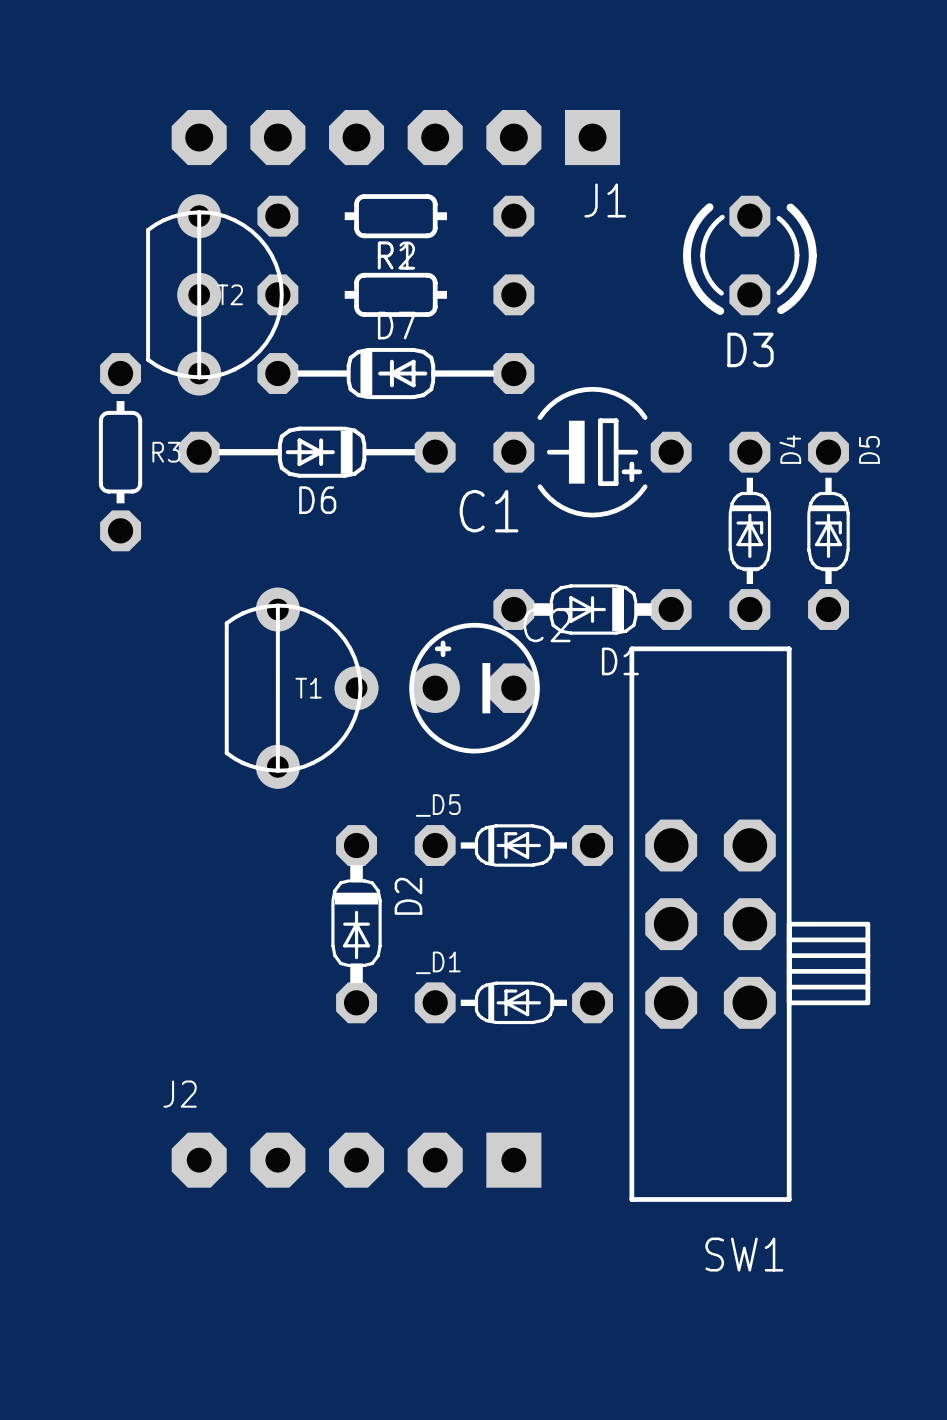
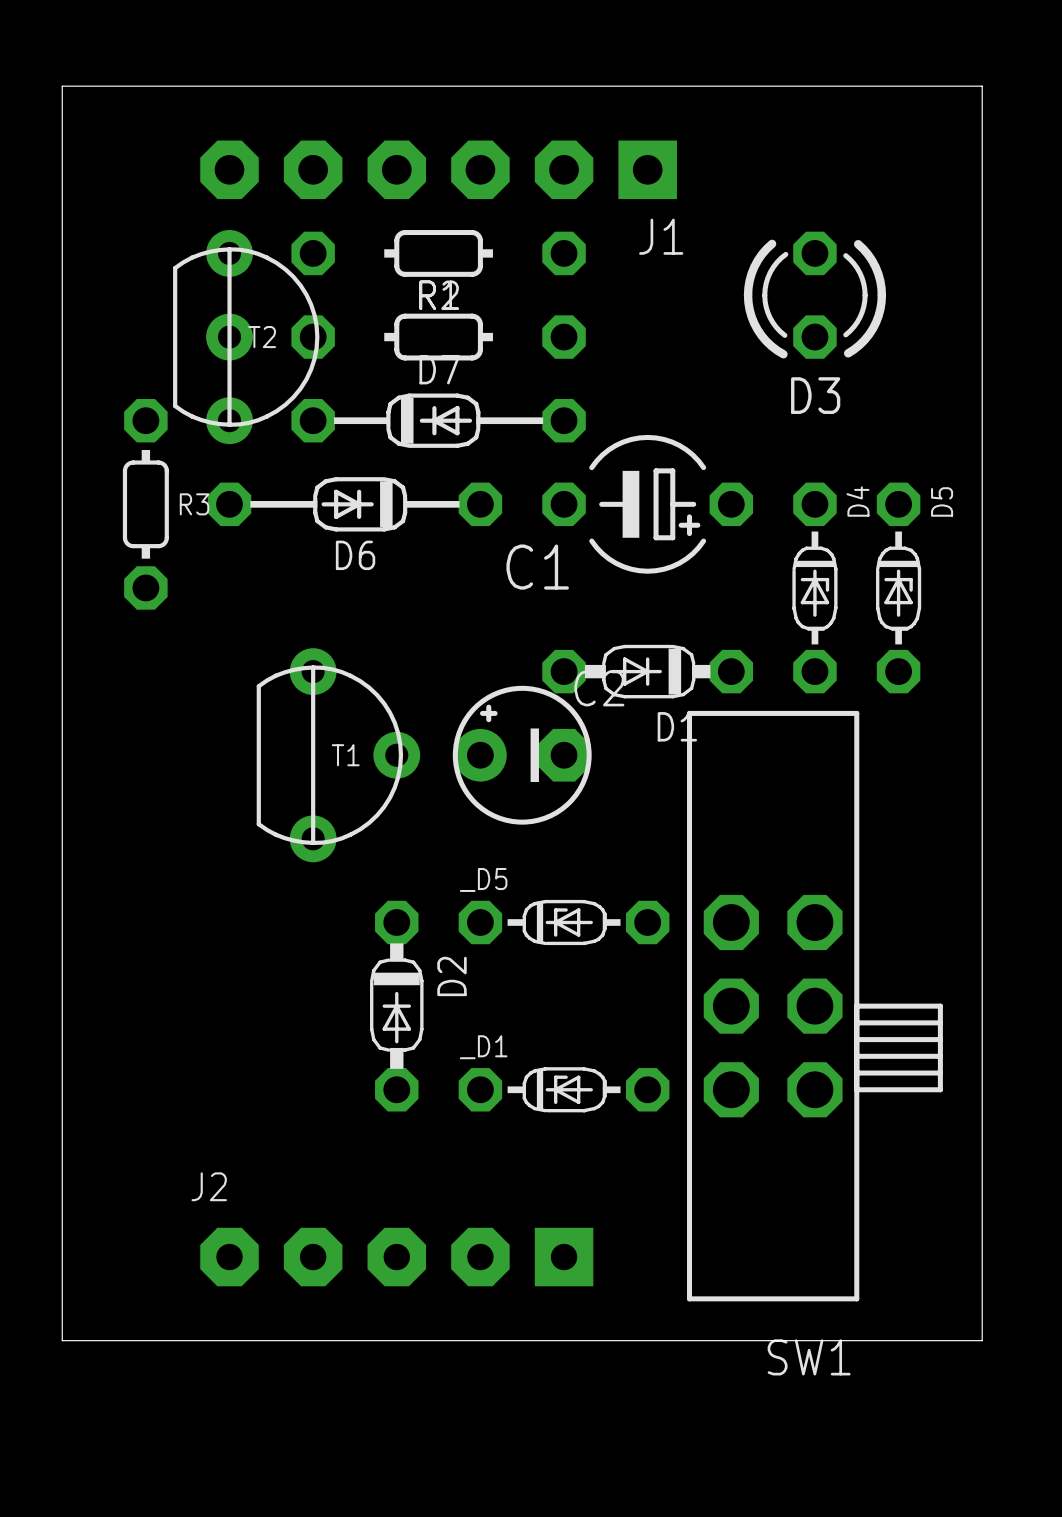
board edge: none -> (62, 86) (982, 86) (982, 1340) (62, 1340) (62, 86)

